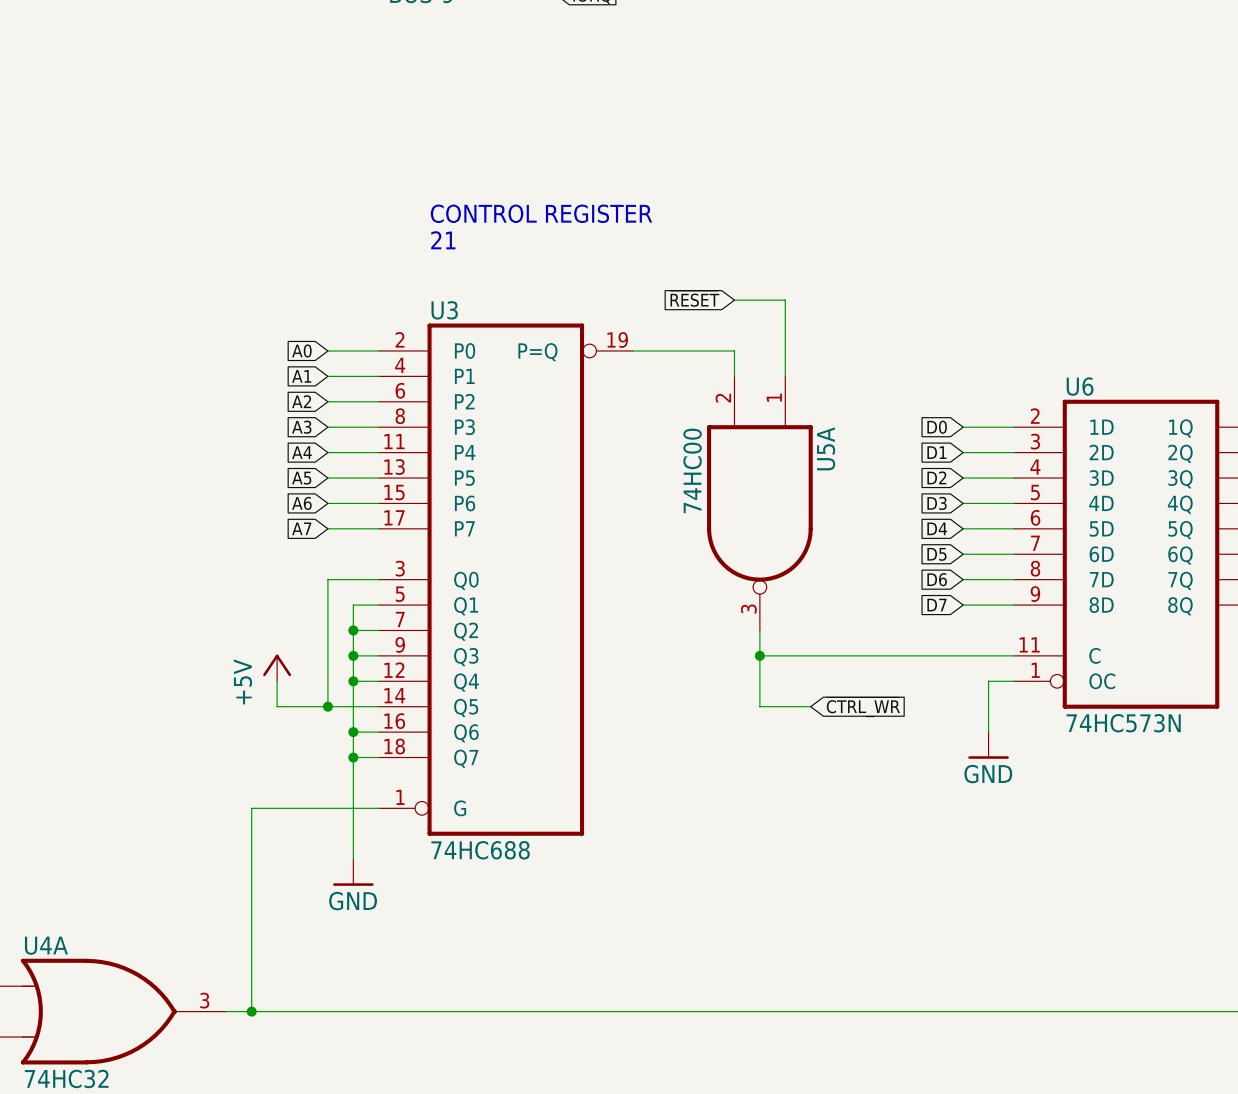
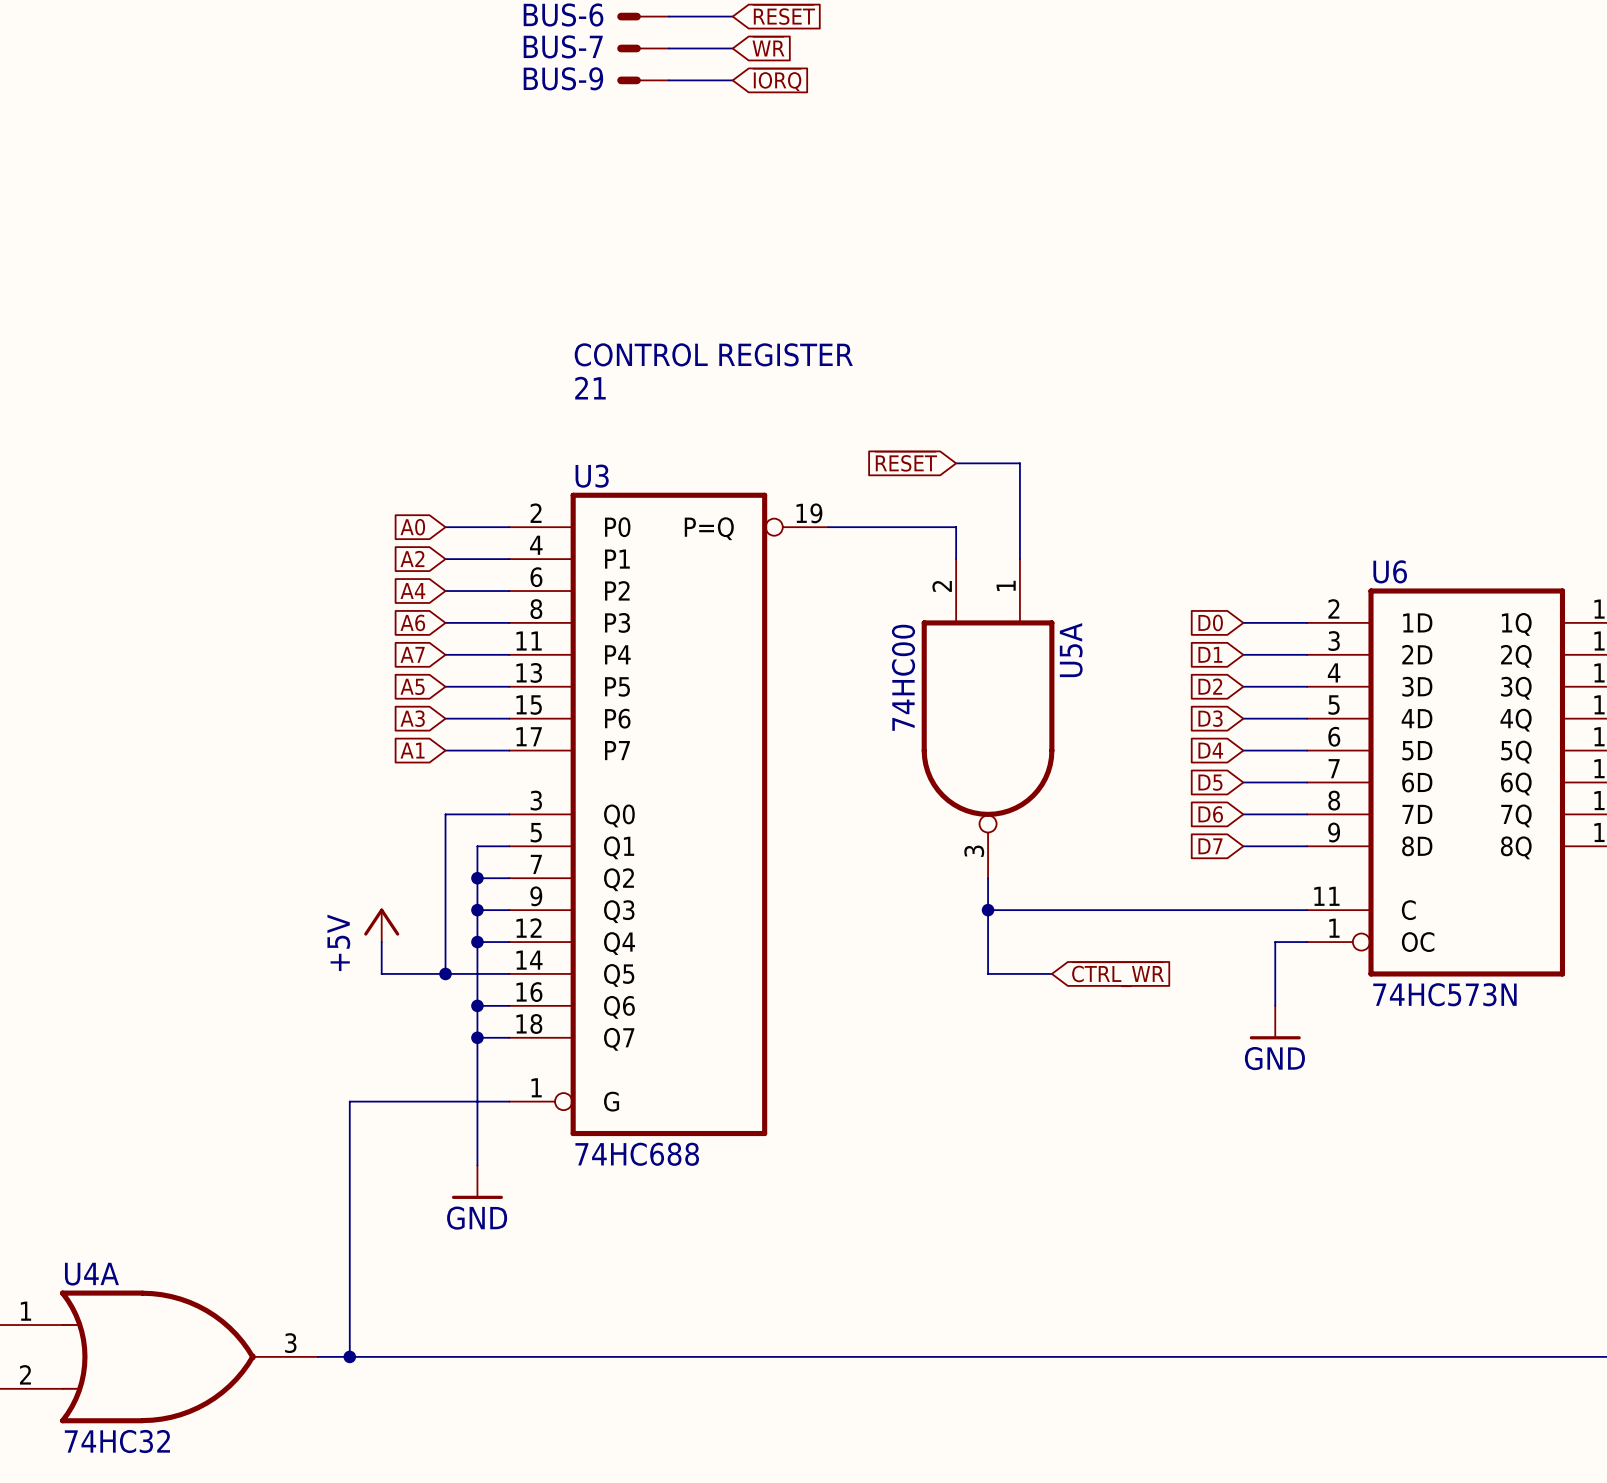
global label: A1 (301, 376) -> A2 (412, 558)
global label: A2 (301, 401) -> A4 (412, 591)
global label: A3 (301, 427) -> A6 (412, 622)
global label: A4 (301, 452) -> A7 (412, 654)
global label: A6 (301, 503) -> A3 (412, 718)
global label: A7 (301, 528) -> A1 (412, 750)

